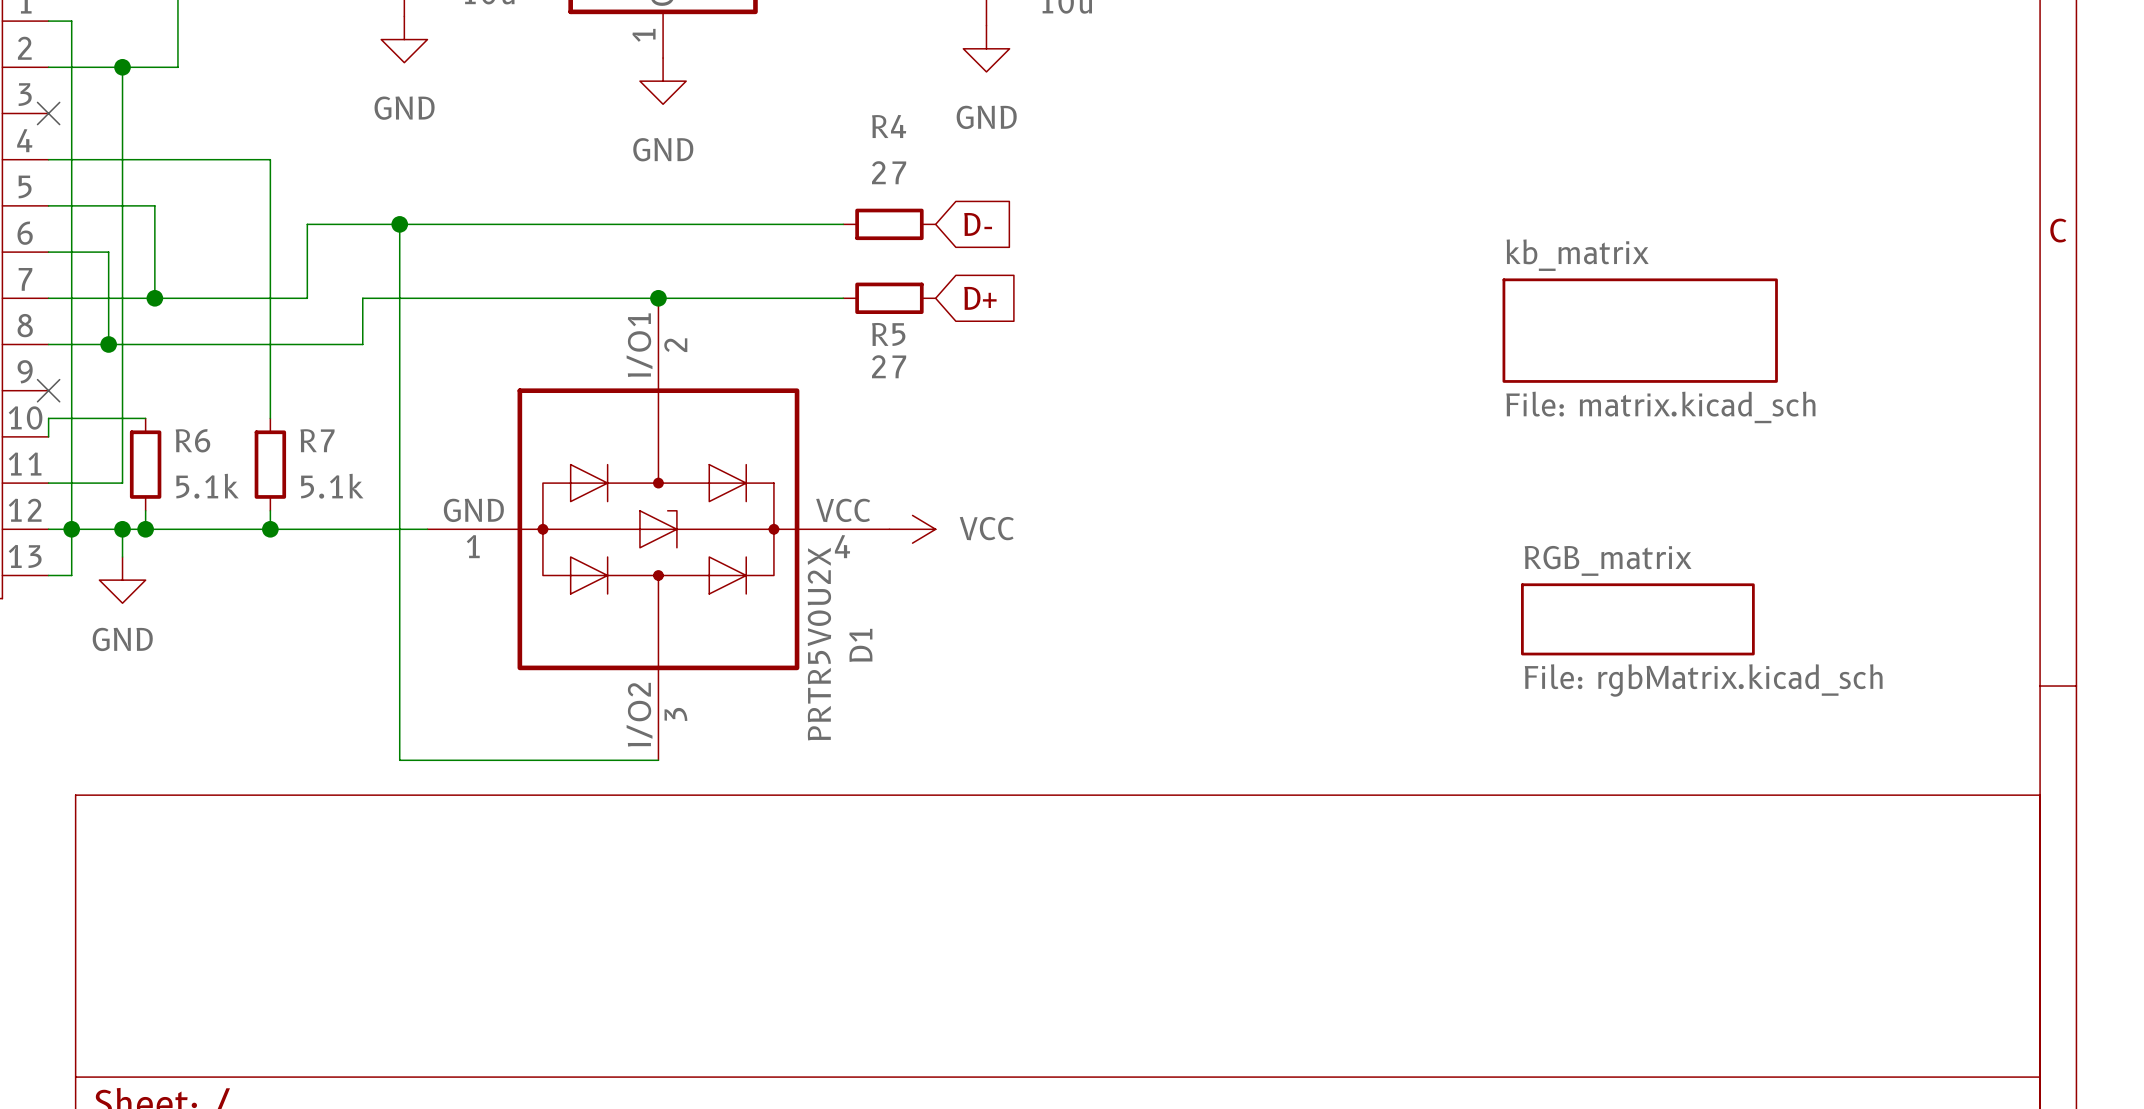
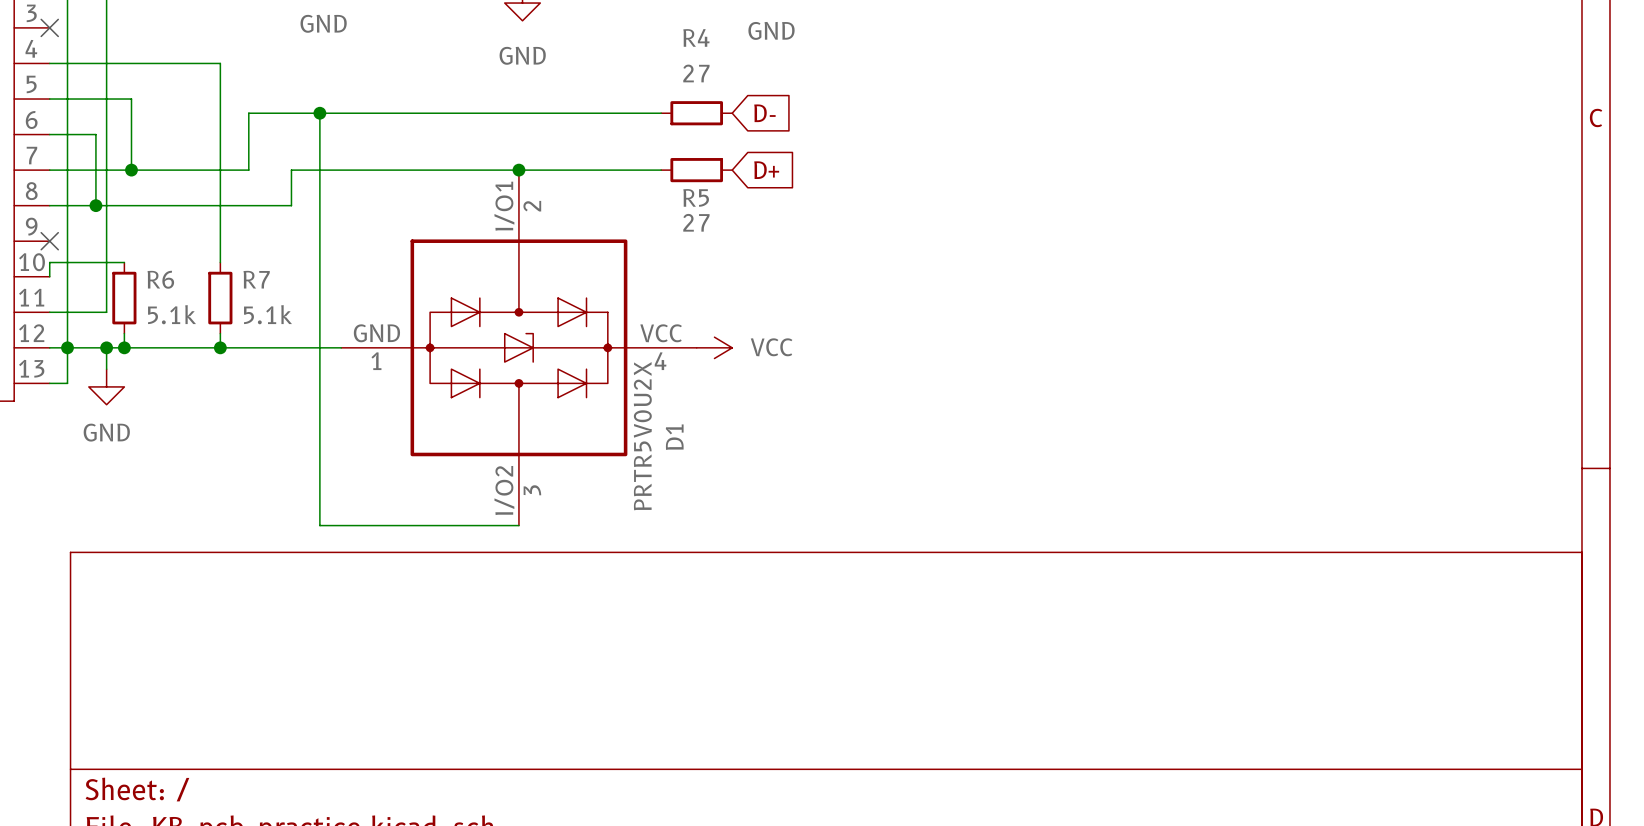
sheet kb_matrix: File: matrix.kicad_sch (1640, 330) -> none
sheet RGB_matrix: File: rgbMatrix.kicad_sch (1637, 619) -> none

